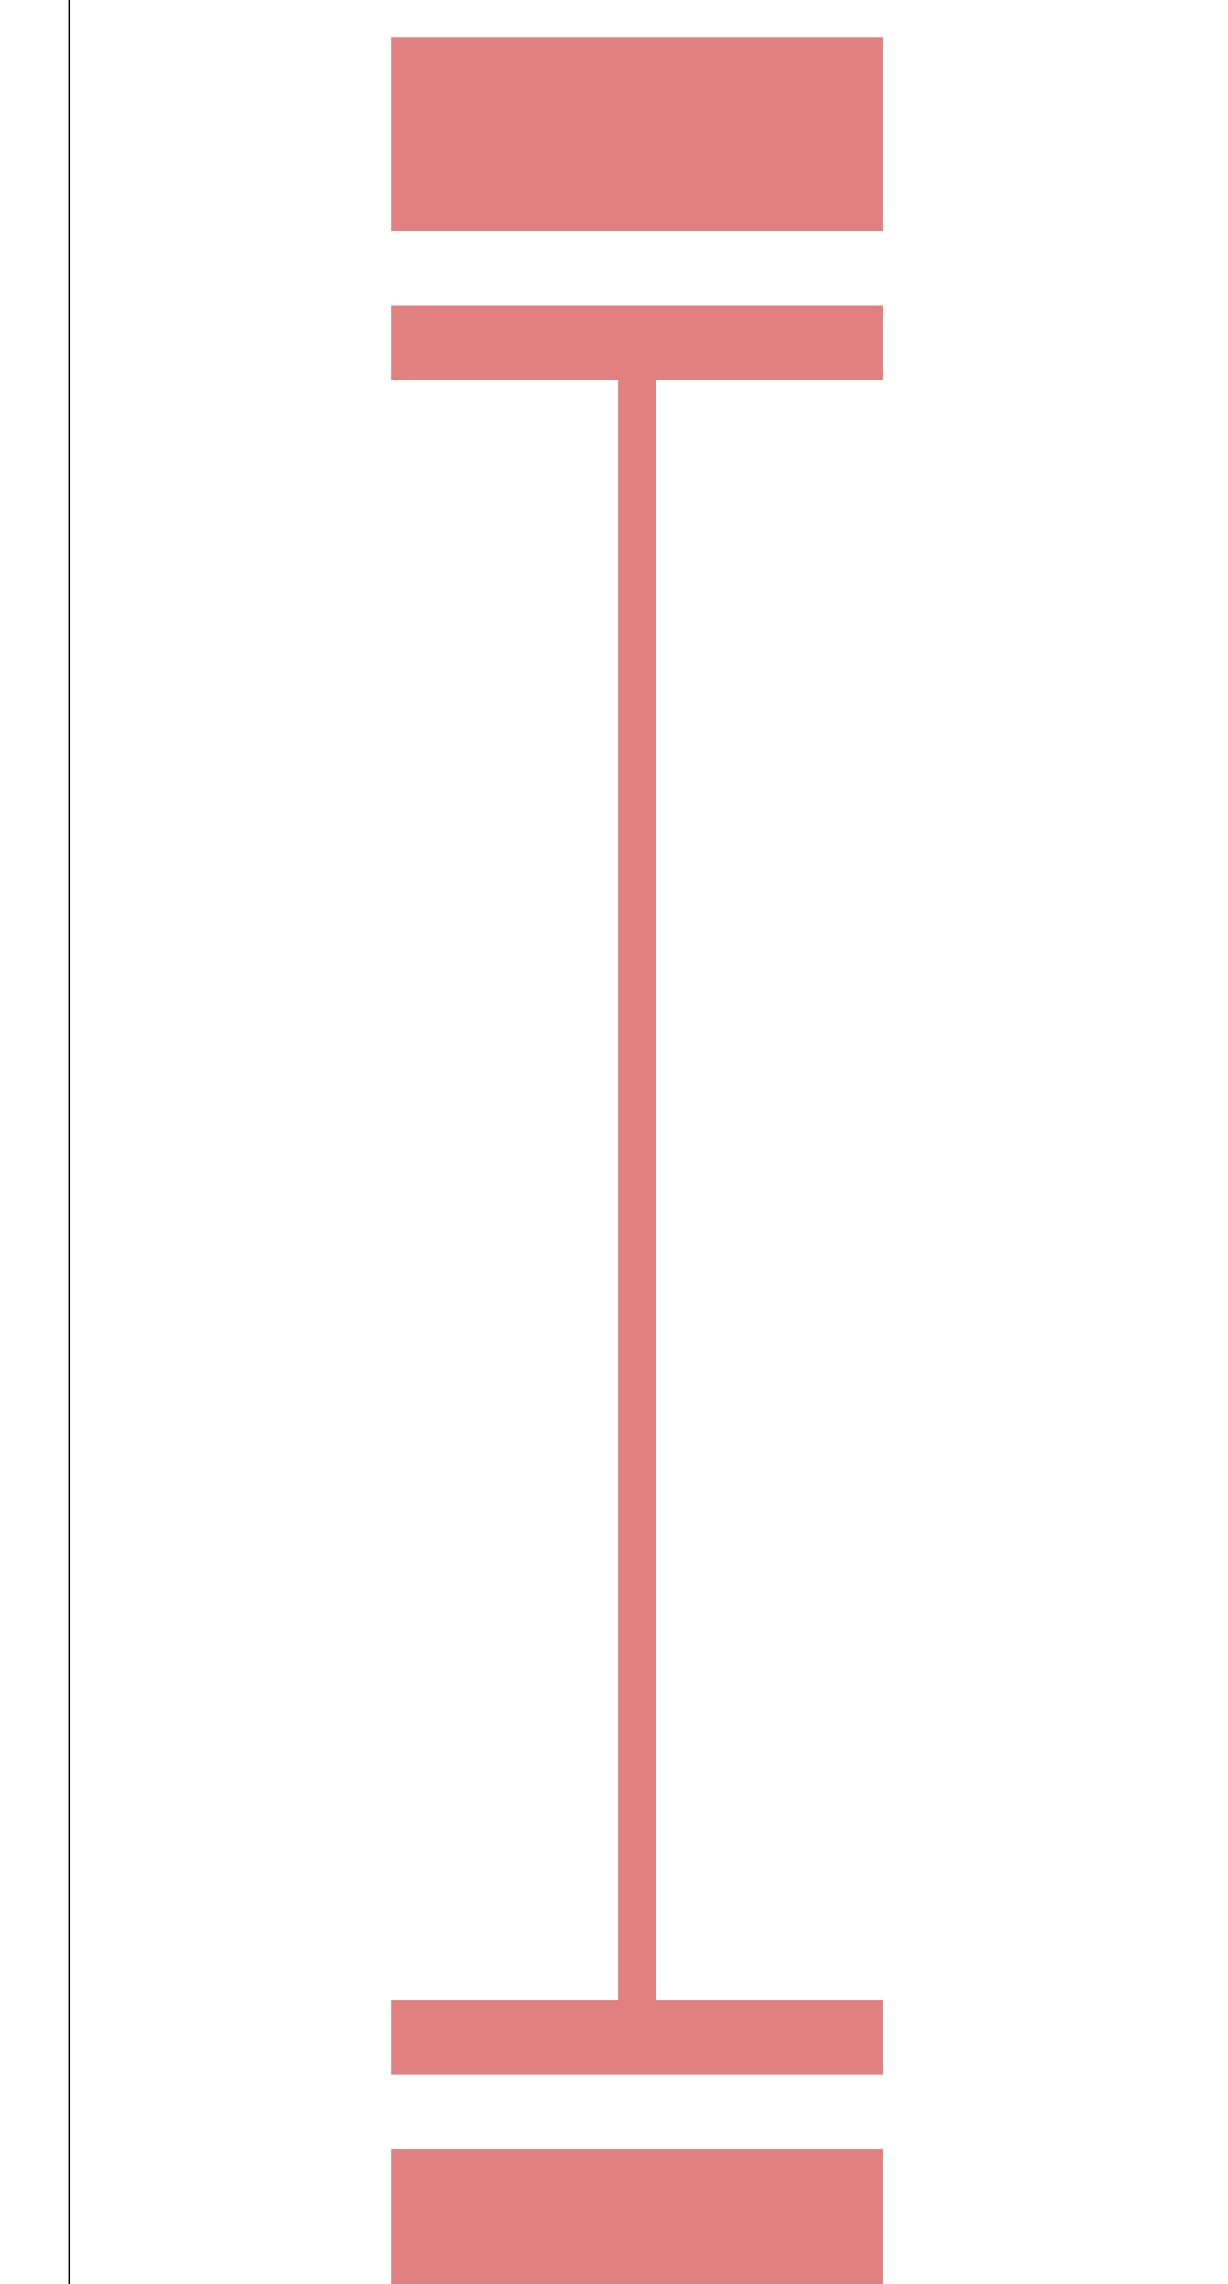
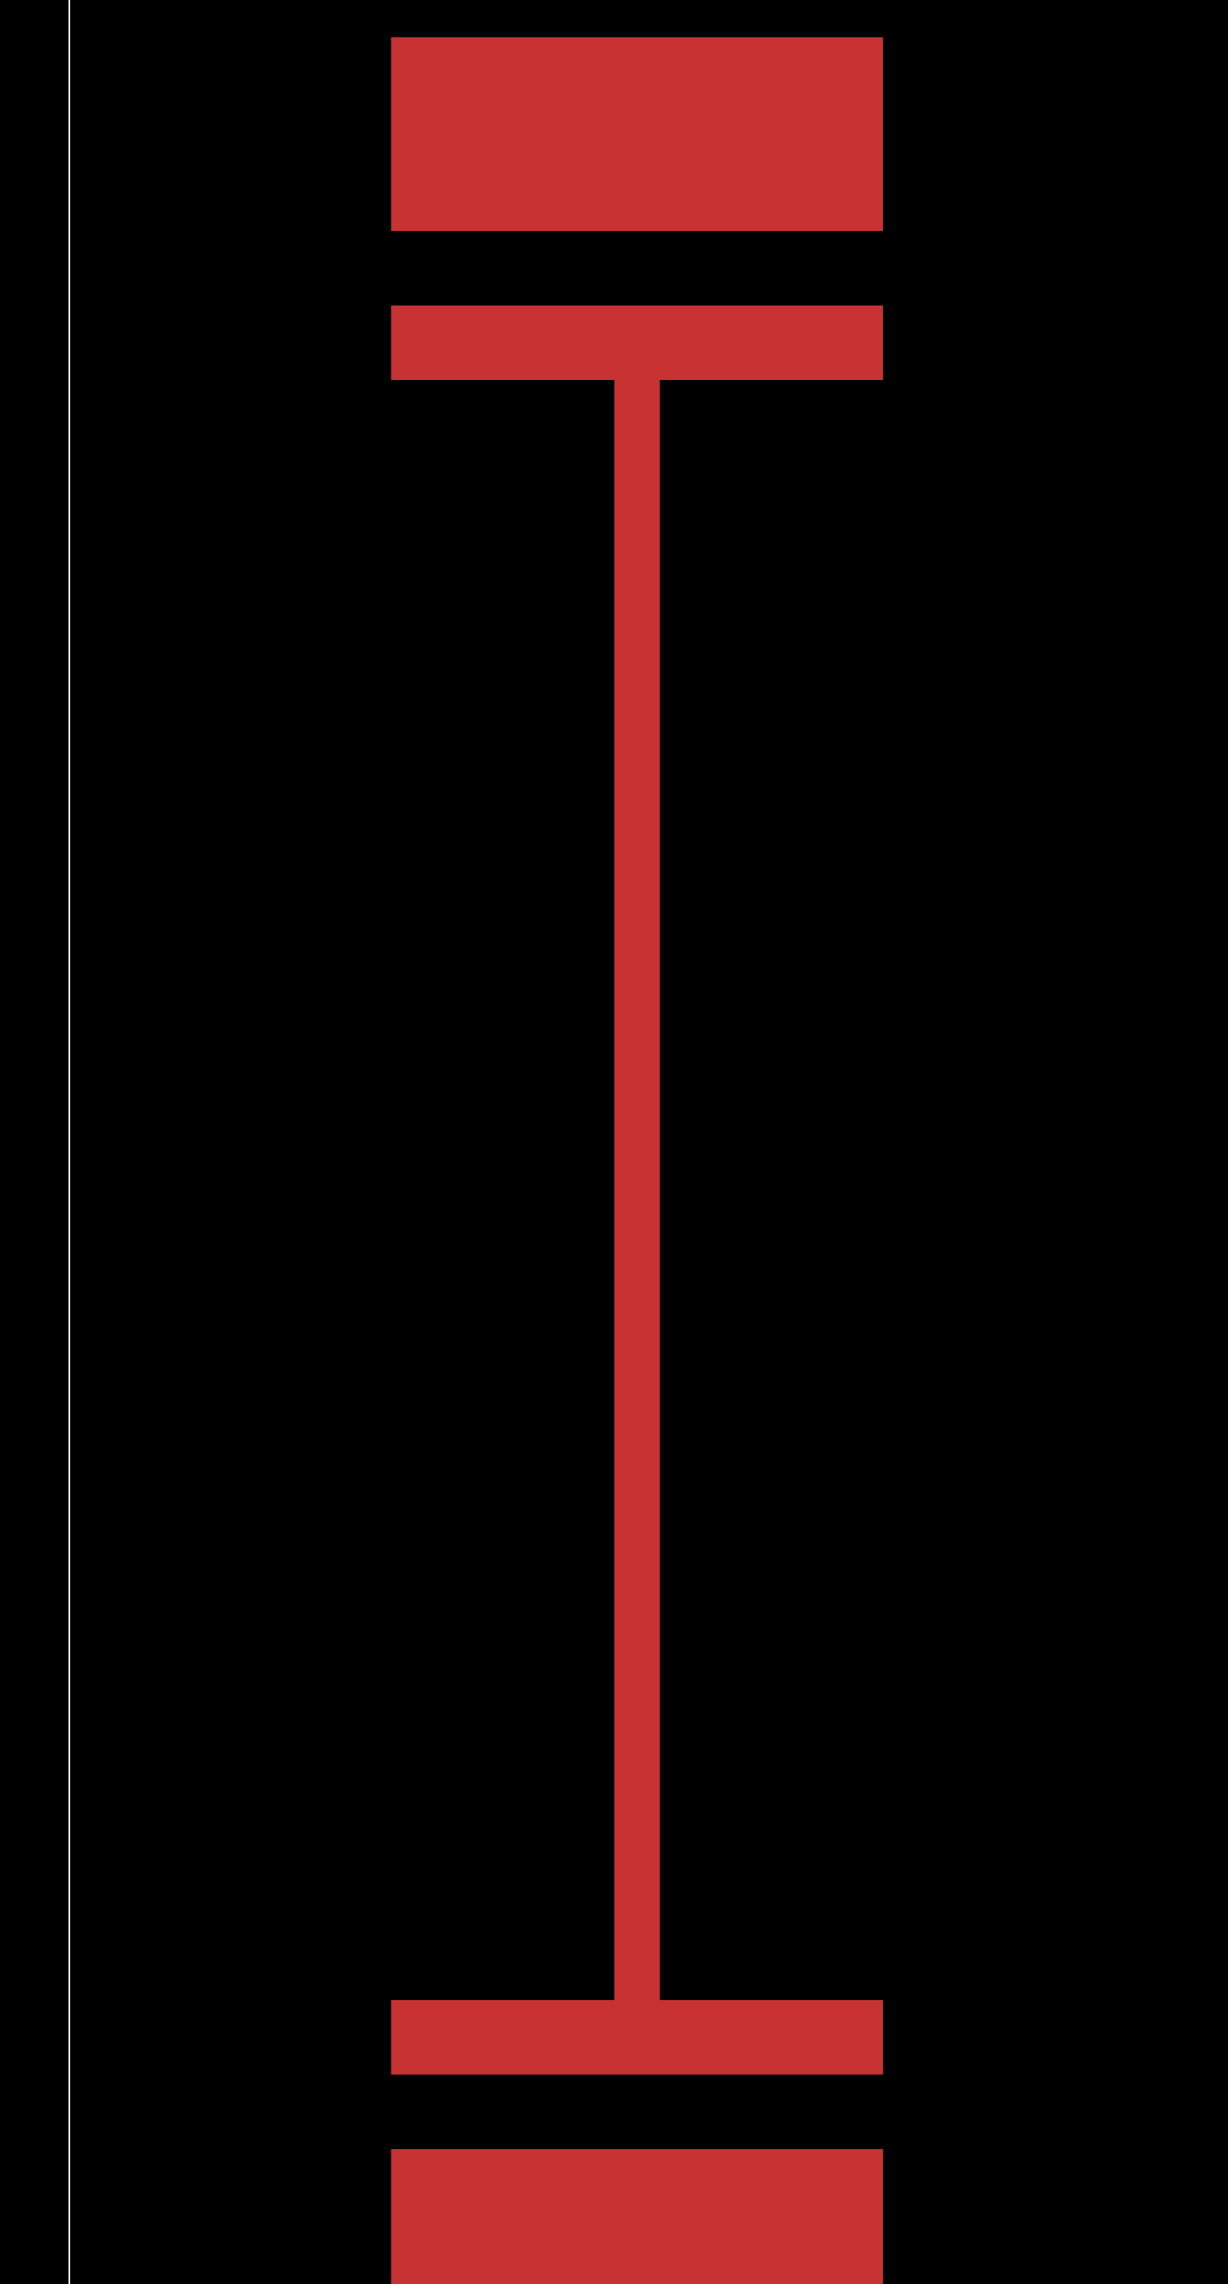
top track width: thin (637, 342) (637, 2037) -> thick (637, 342) (637, 2037)

